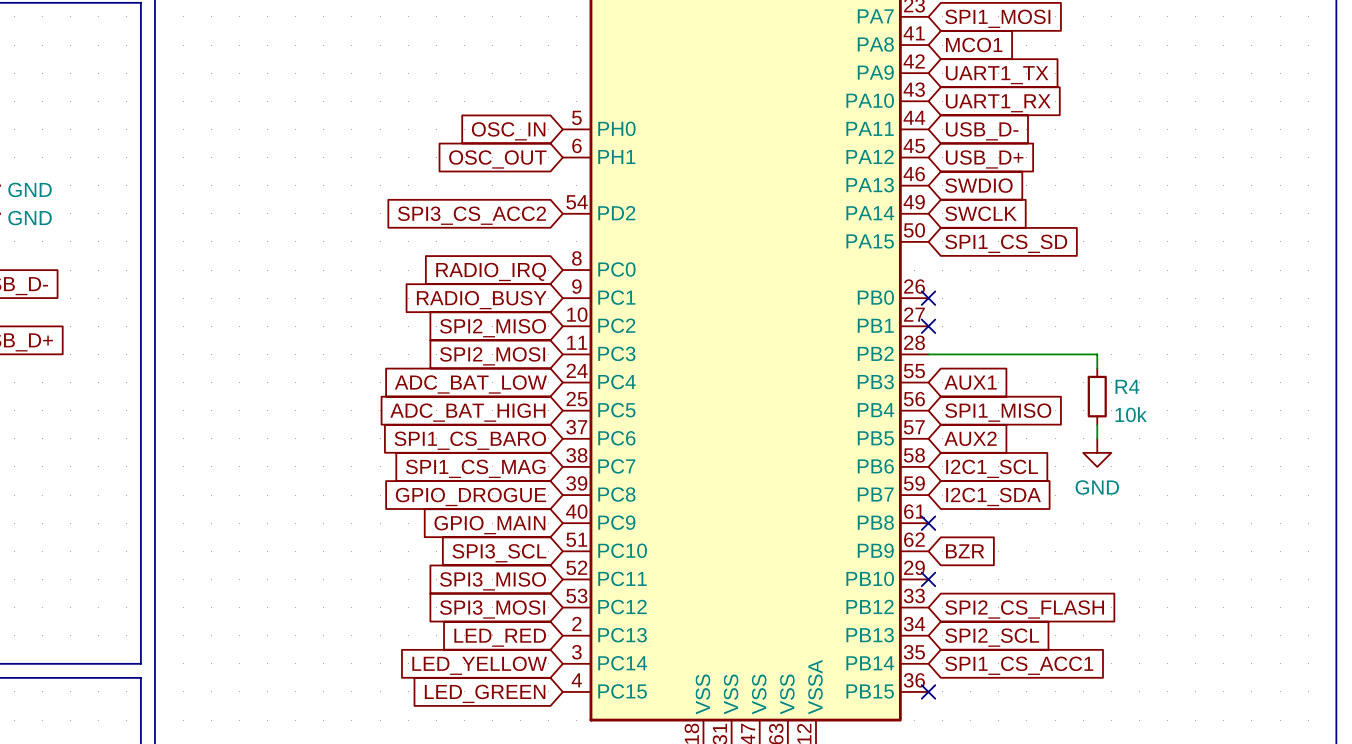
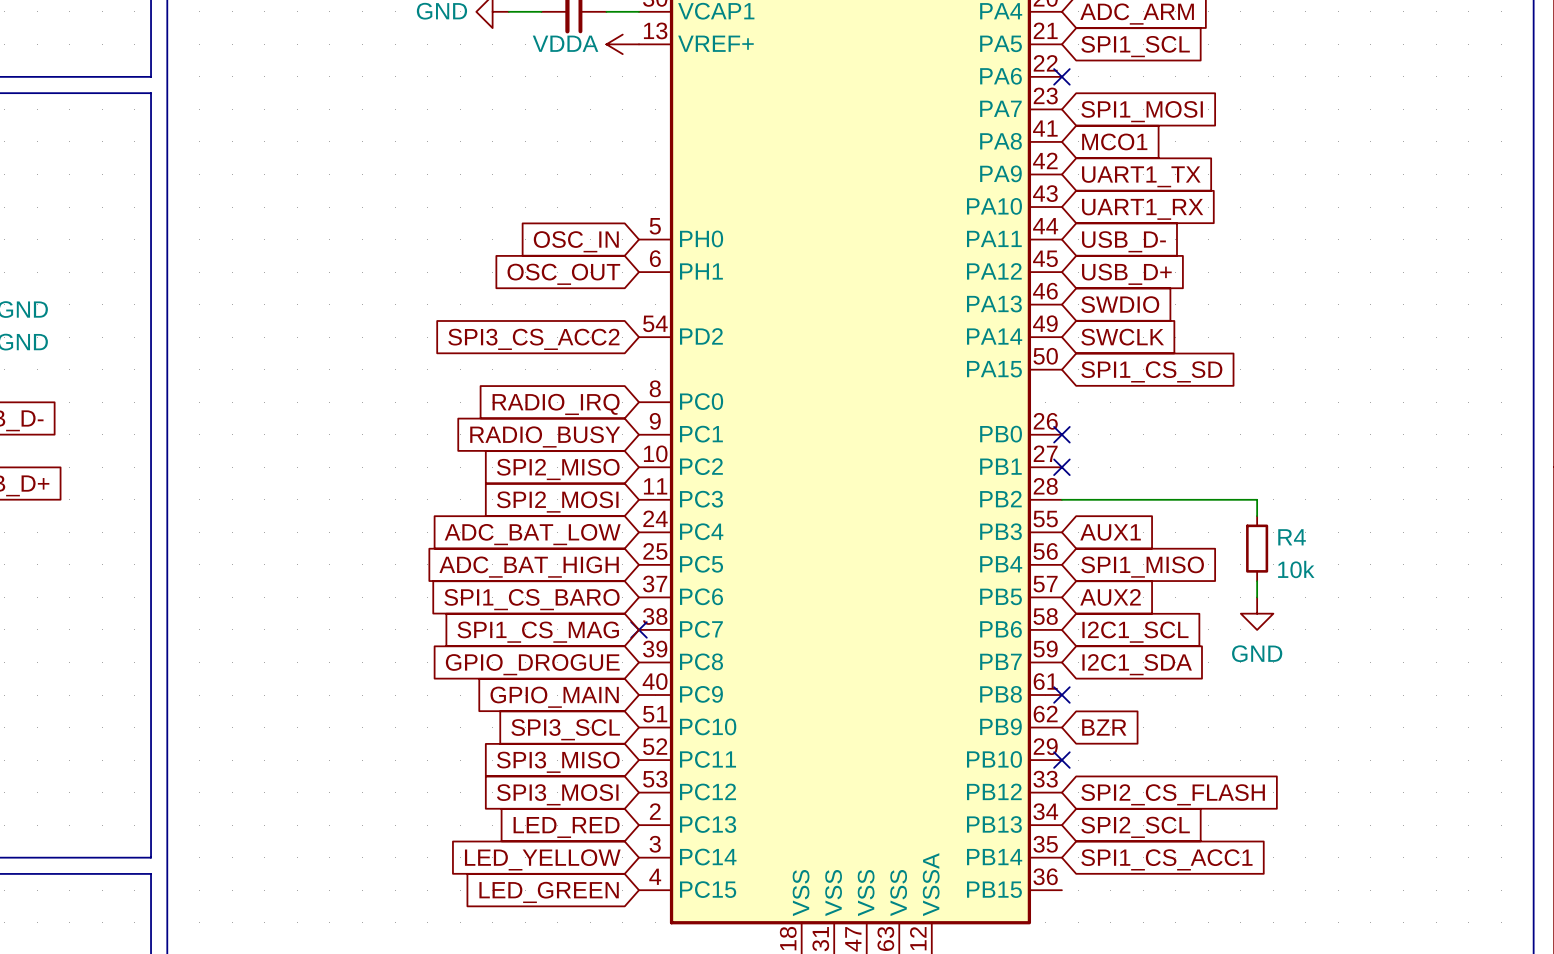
no-connect mark: none -> (639, 629)
no-connect mark: (928, 691) -> none

